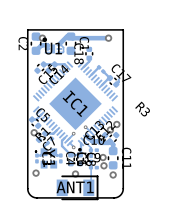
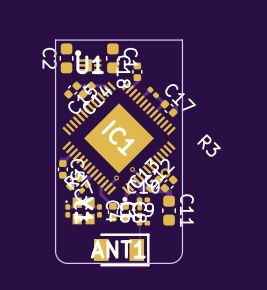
via: (42, 38) -> none
track: (108, 38) (67, 36) (59, 43) -> none
via: (108, 38) -> none
track: (59, 45) (63, 47) (63, 51) (59, 52) -> none
track: (47, 48) (47, 45) (41, 45) (36, 50) -> none
C5 rotation: 0° (35, 122) -> 45° clockwise (62, 169)
via: (116, 124) -> none
via: (34, 132) -> none
track: (69, 143) (73, 147) -> none
via: (73, 147) -> none
via: (103, 157) -> none
via: (103, 165) -> none
via: (36, 173) -> none
via: (75, 174) -> none
via: (113, 174) -> none

